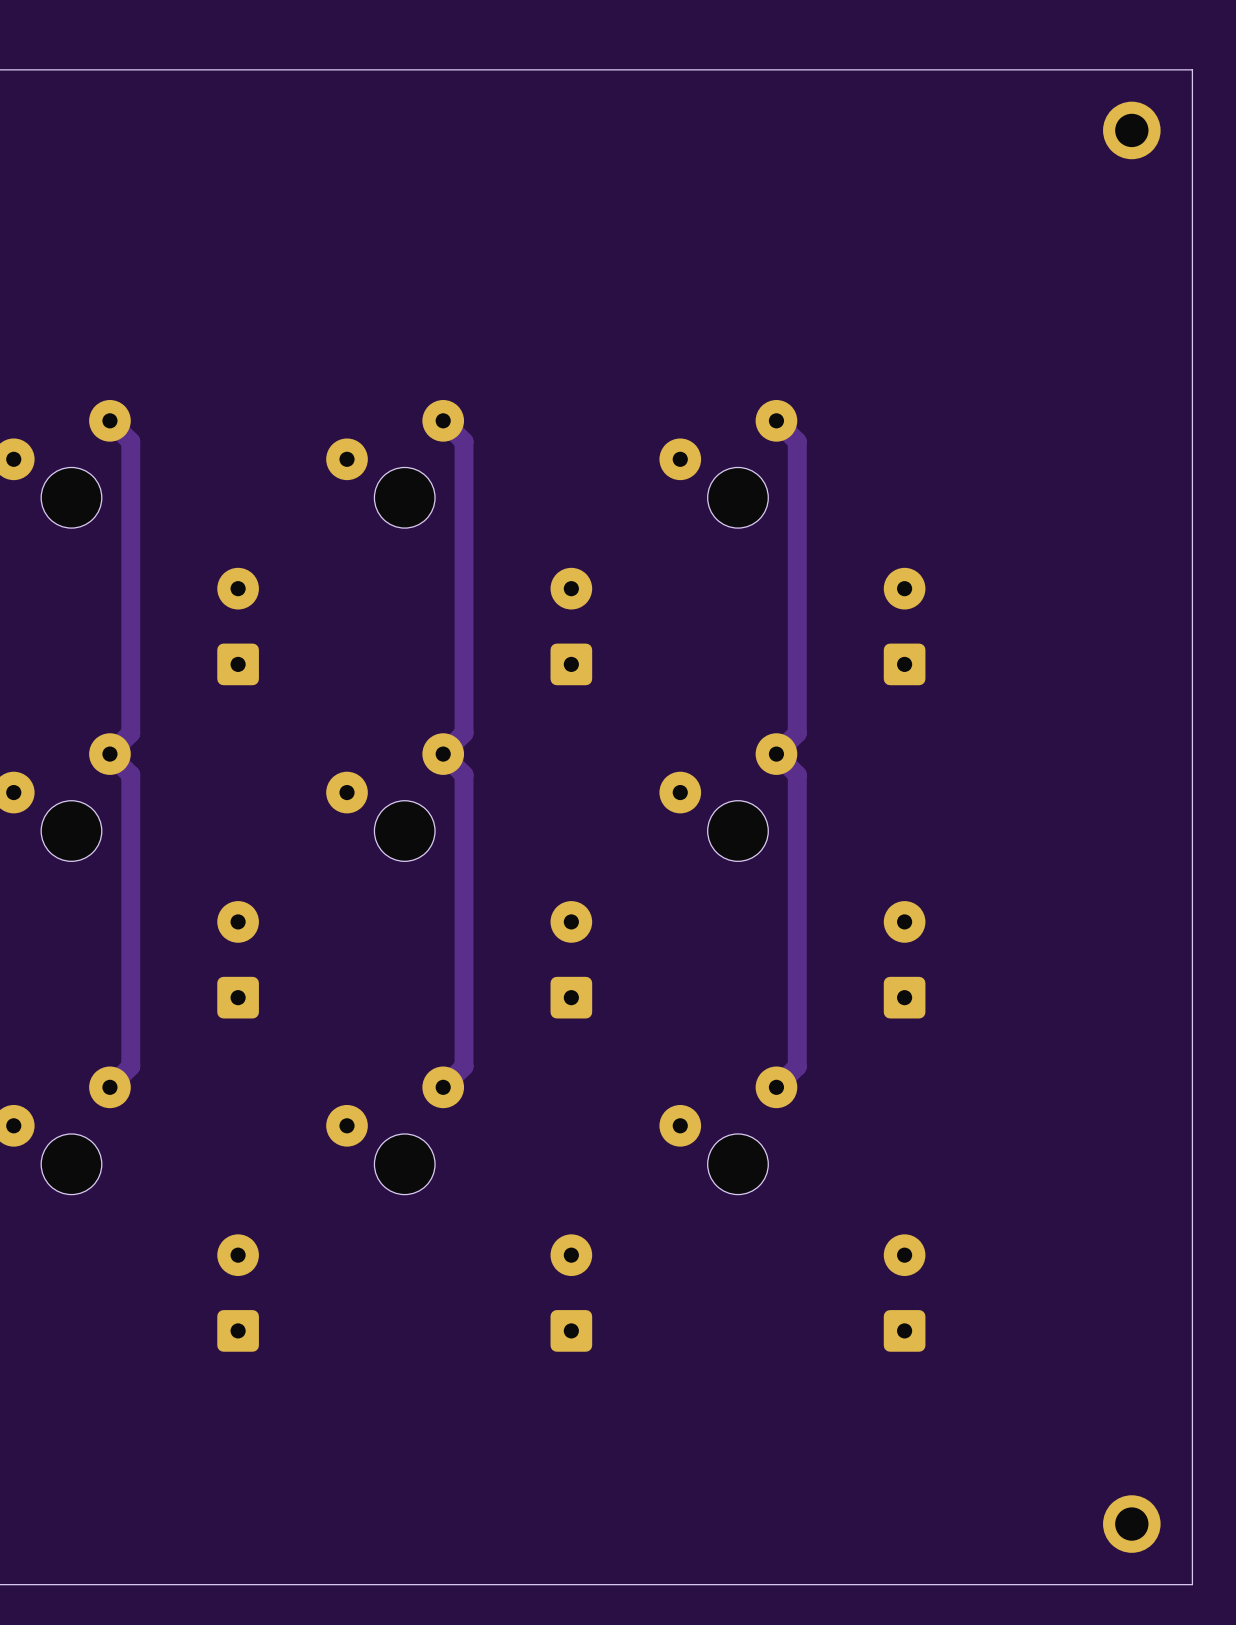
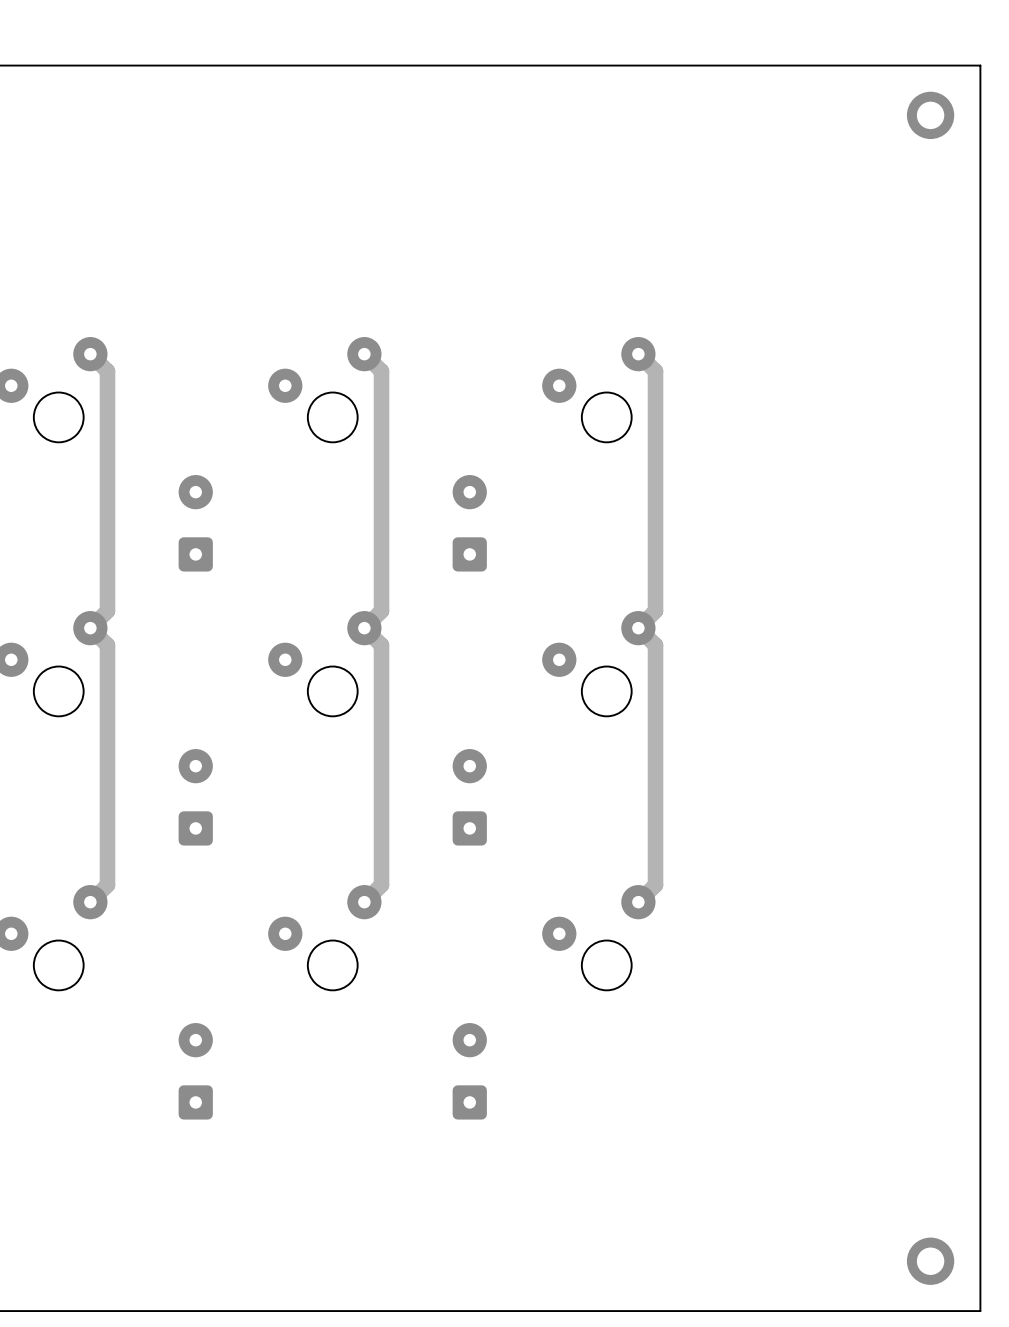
part: (904, 626) -> none
part: (904, 959) -> none
part: (904, 1293) -> none

